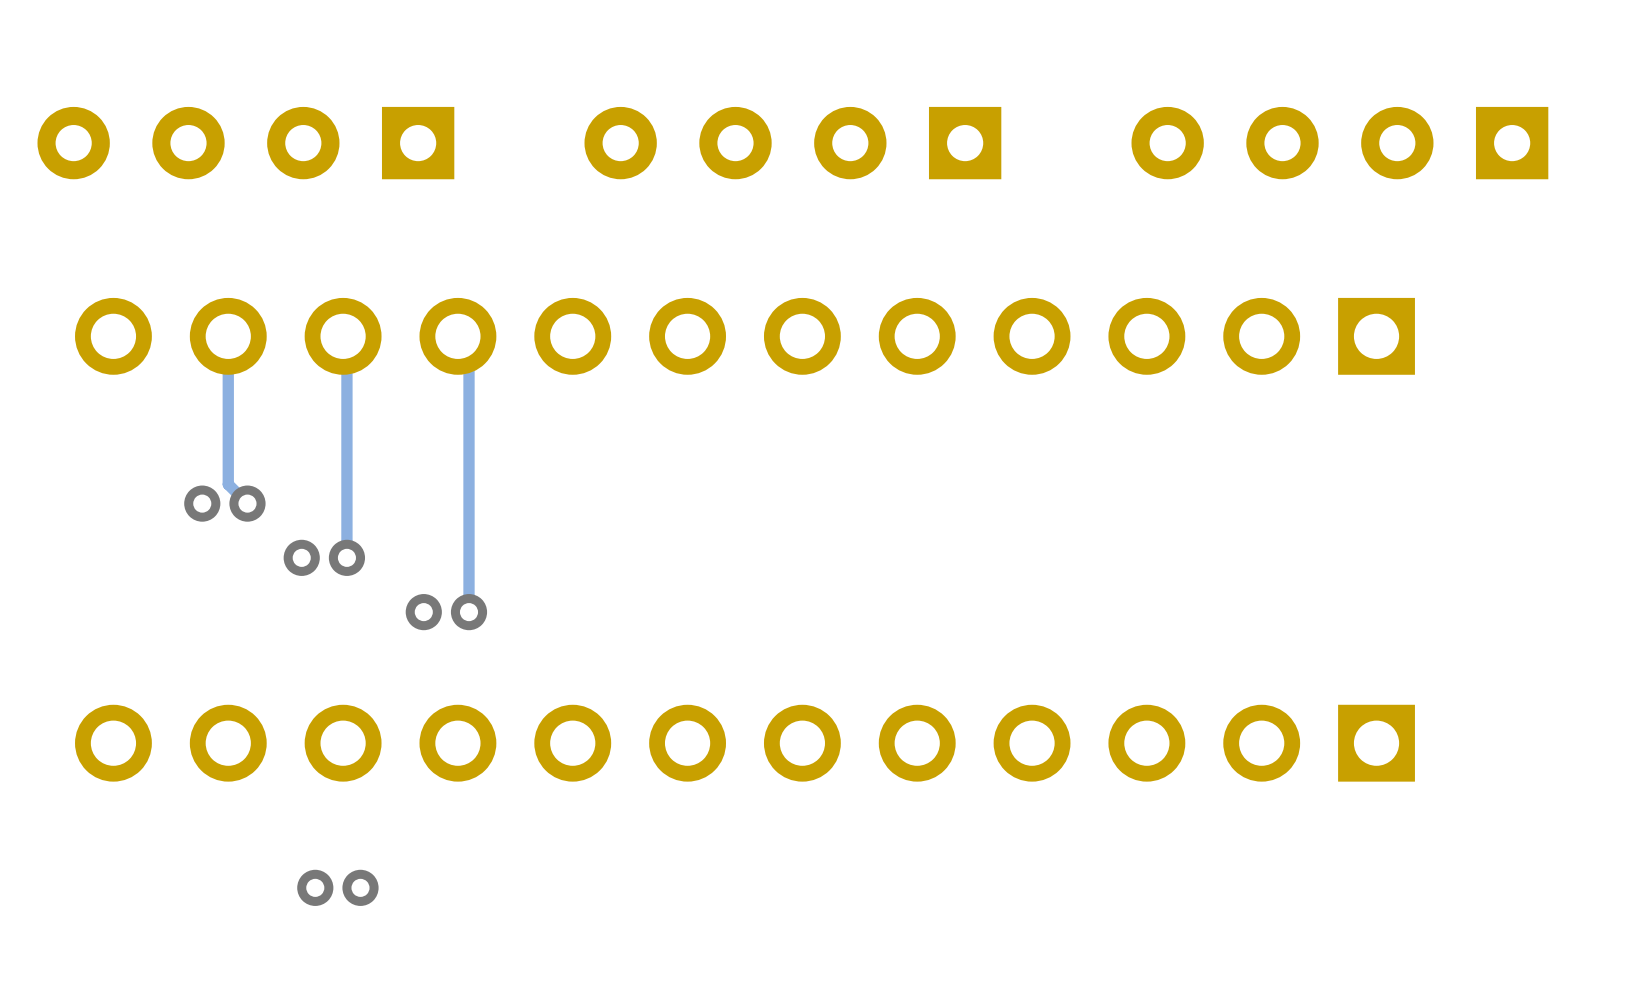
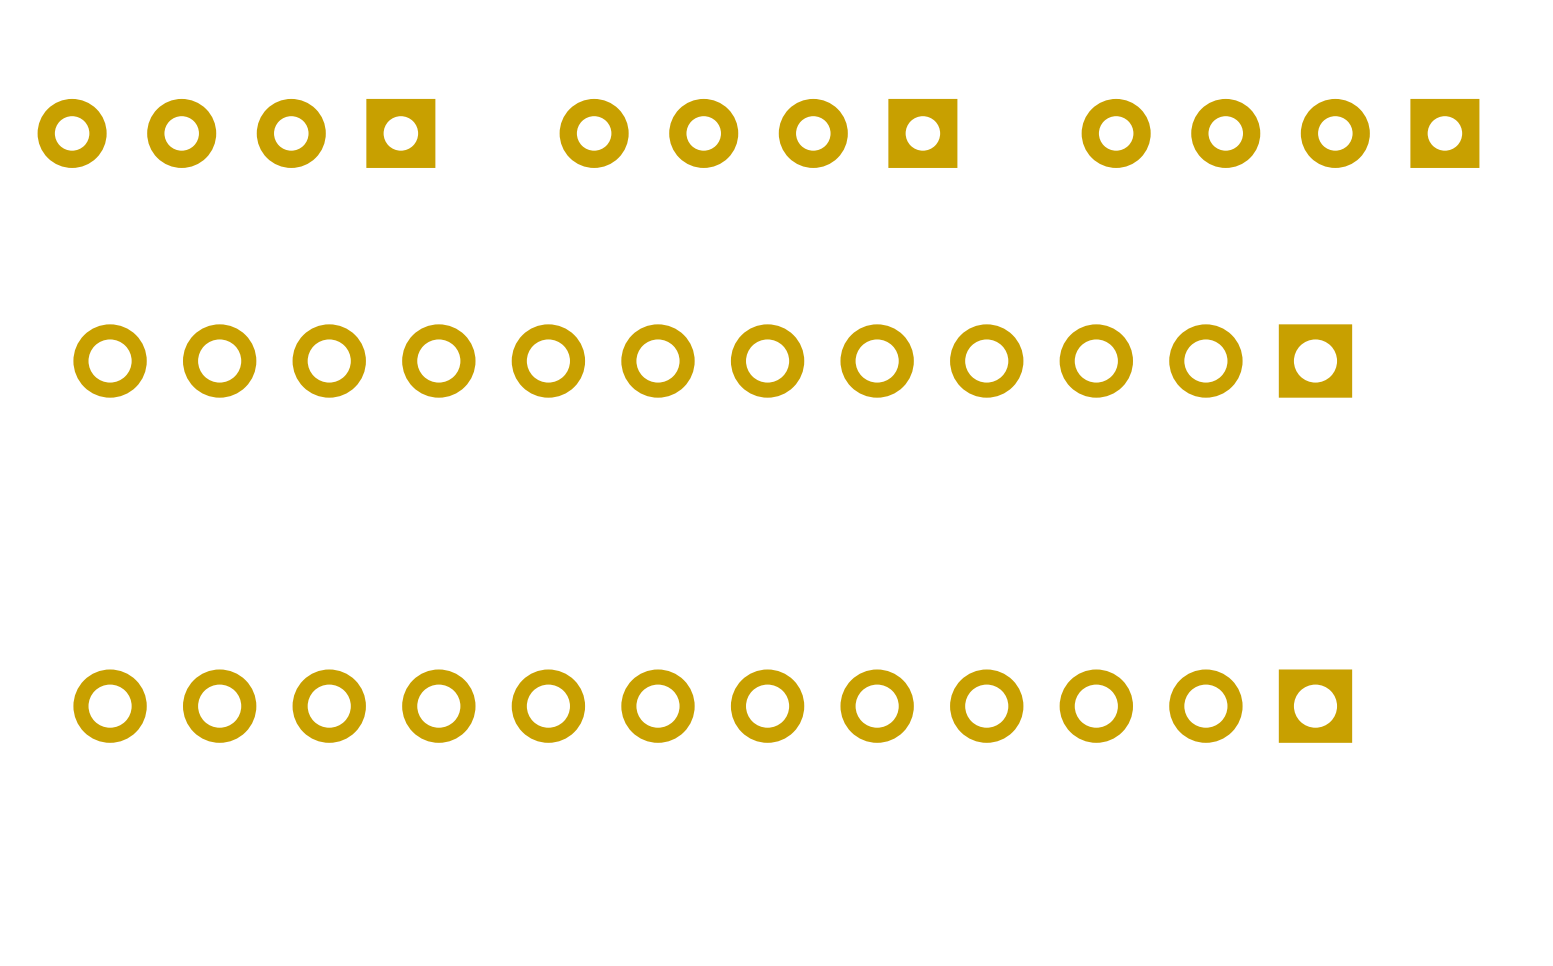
track: (228, 336) (228, 484) (247, 503) -> none
track: (343, 336) (346, 340) (346, 557) -> none
track: (457, 336) (469, 347) (469, 612) -> none
part position: (744, 336) -> (712, 361)
via: (202, 503) -> none
via: (247, 503) -> none
via: (301, 557) -> none
via: (346, 557) -> none
via: (423, 612) -> none
via: (469, 612) -> none
via: (315, 887) -> none
via: (360, 887) -> none

